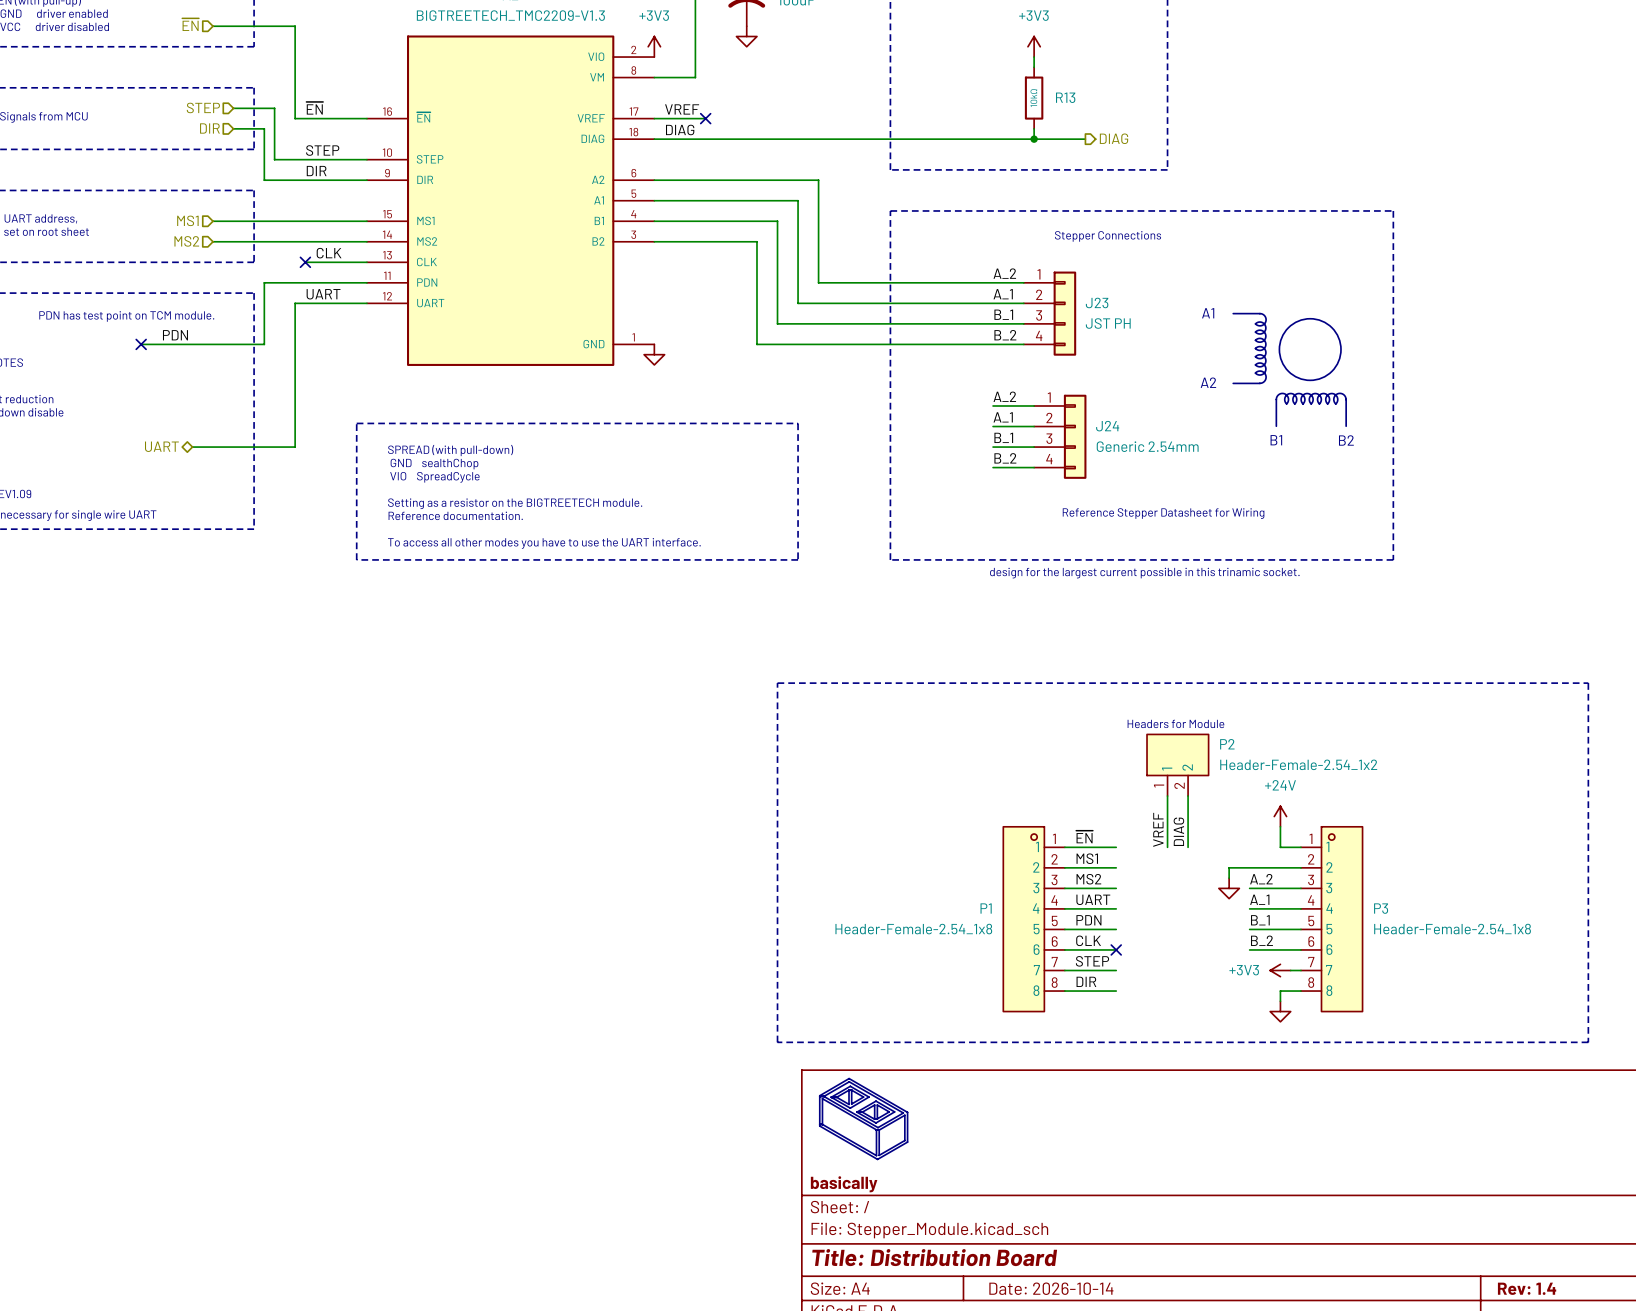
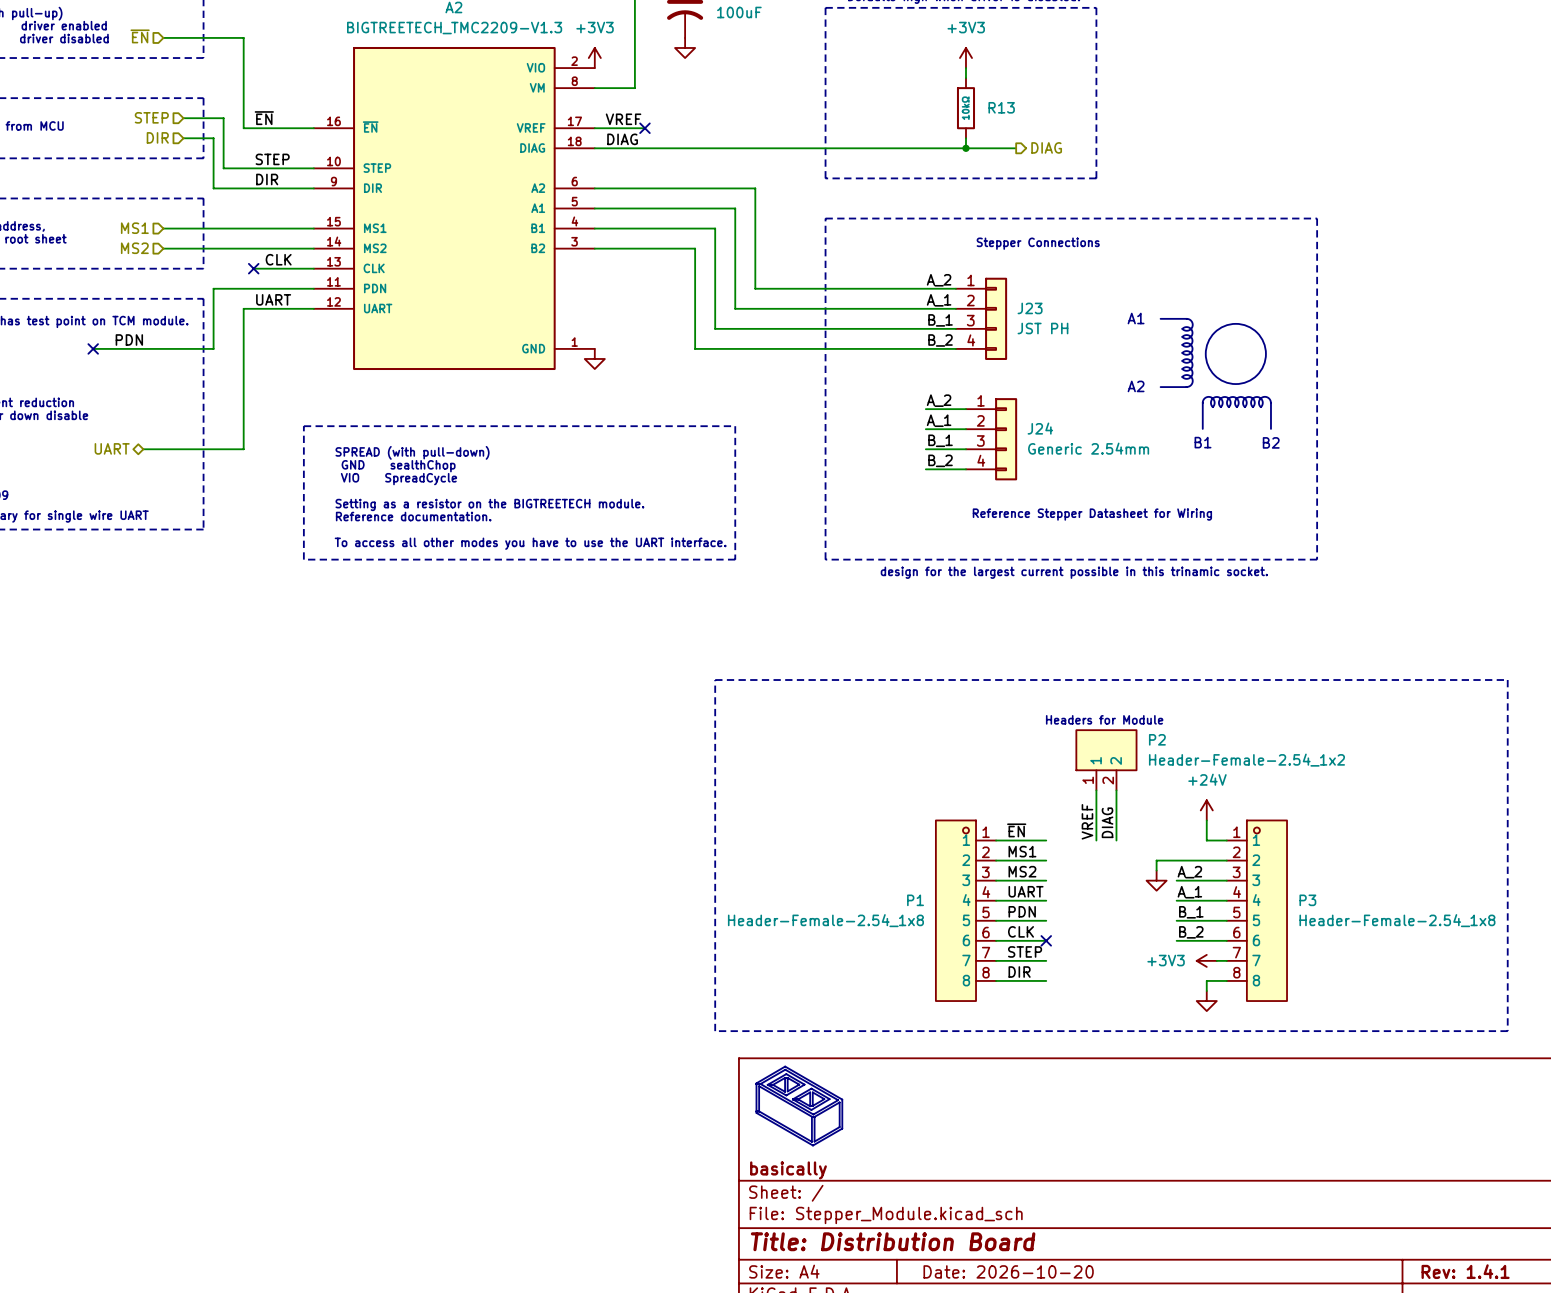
title block: Date: 2026-10-14 (1051, 1288) -> Date: 2026-10-20 (1008, 1271)
title block: Rev: 1.4 (1527, 1288) -> Rev: 1.4.1 (1465, 1271)

